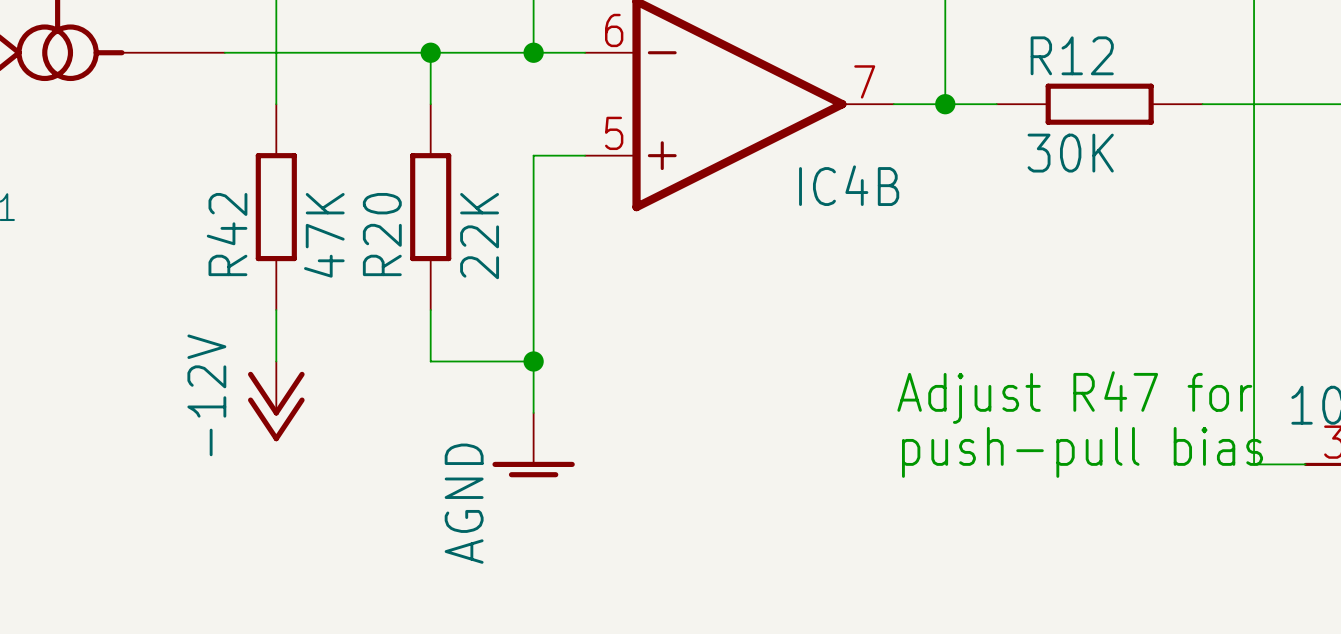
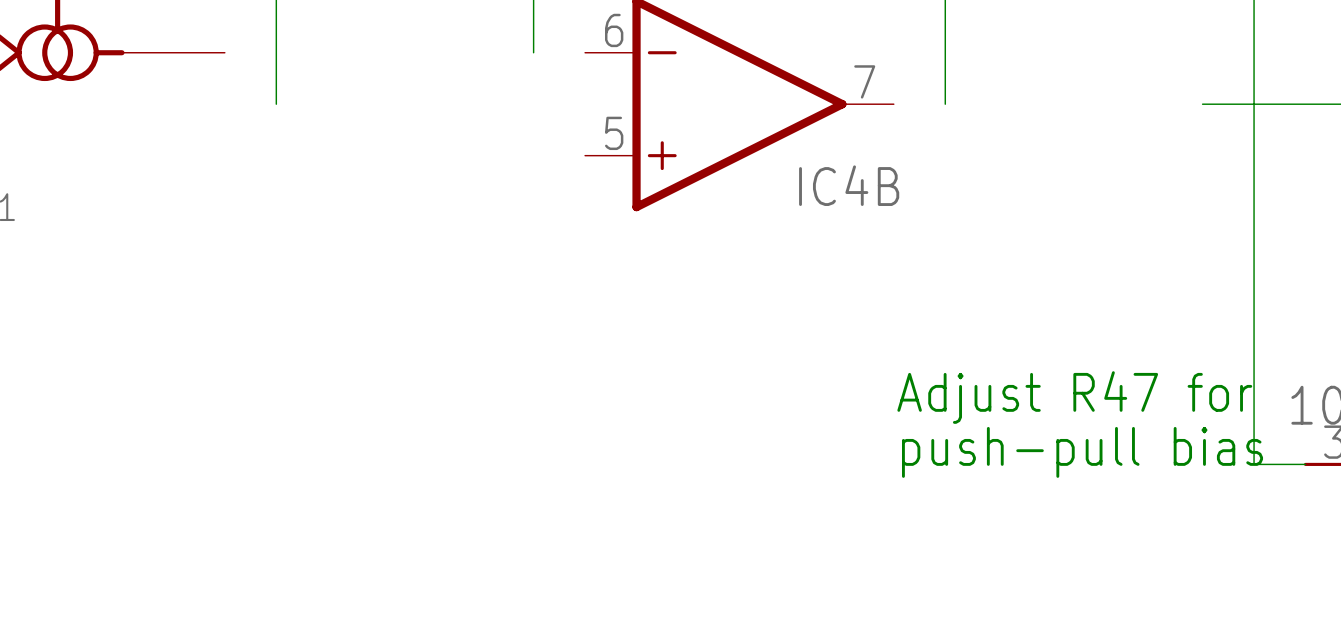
wire: (224, 52) (585, 52) -> none
wire: (430, 52) (430, 104) -> none
junction: (430, 52) -> none
junction: (533, 52) -> none
wire: (893, 104) (996, 104) -> none
junction: (945, 104) -> none
R12: 30K (1099, 104) -> none
wire: (585, 155) (533, 155) (533, 412) -> none
R42: 47K (276, 207) -> none
R20: 22K (430, 207) -> none
wire: (276, 310) (276, 361) -> none
wire: (430, 310) (430, 361) (533, 361) -> none
junction: (533, 361) -> none
power symbol: -12V (276, 401) -> none
power symbol: AGND (533, 445) -> none

